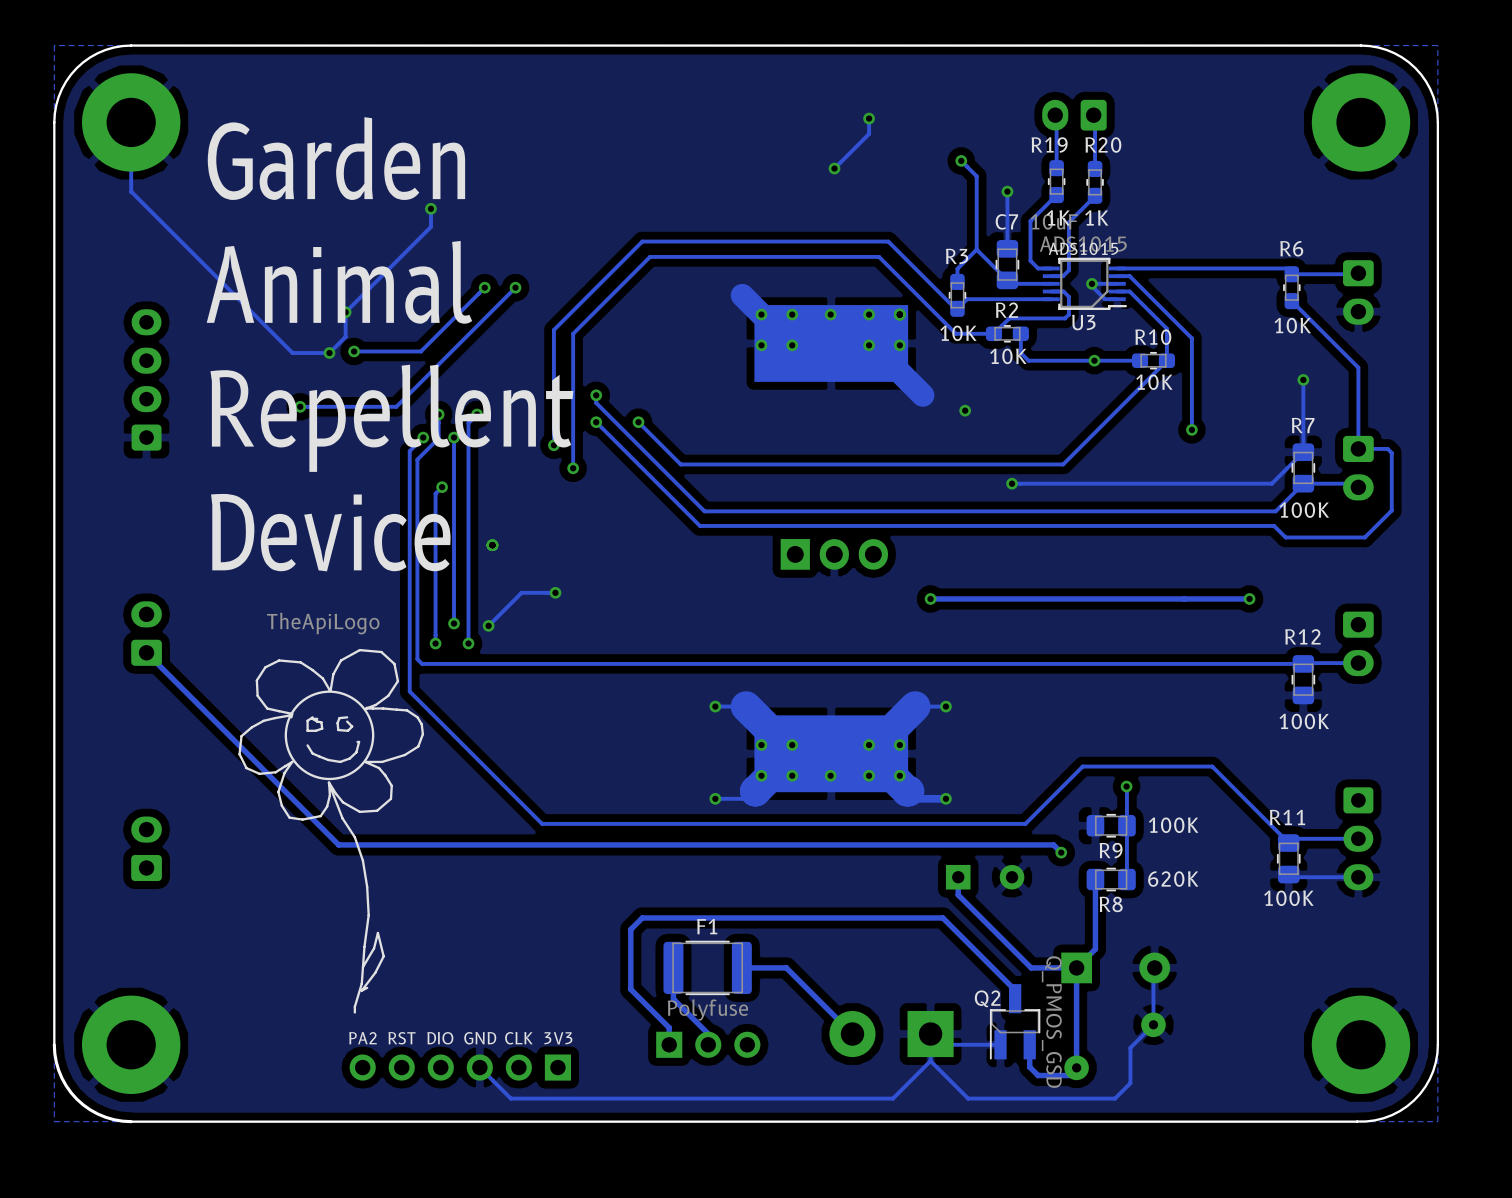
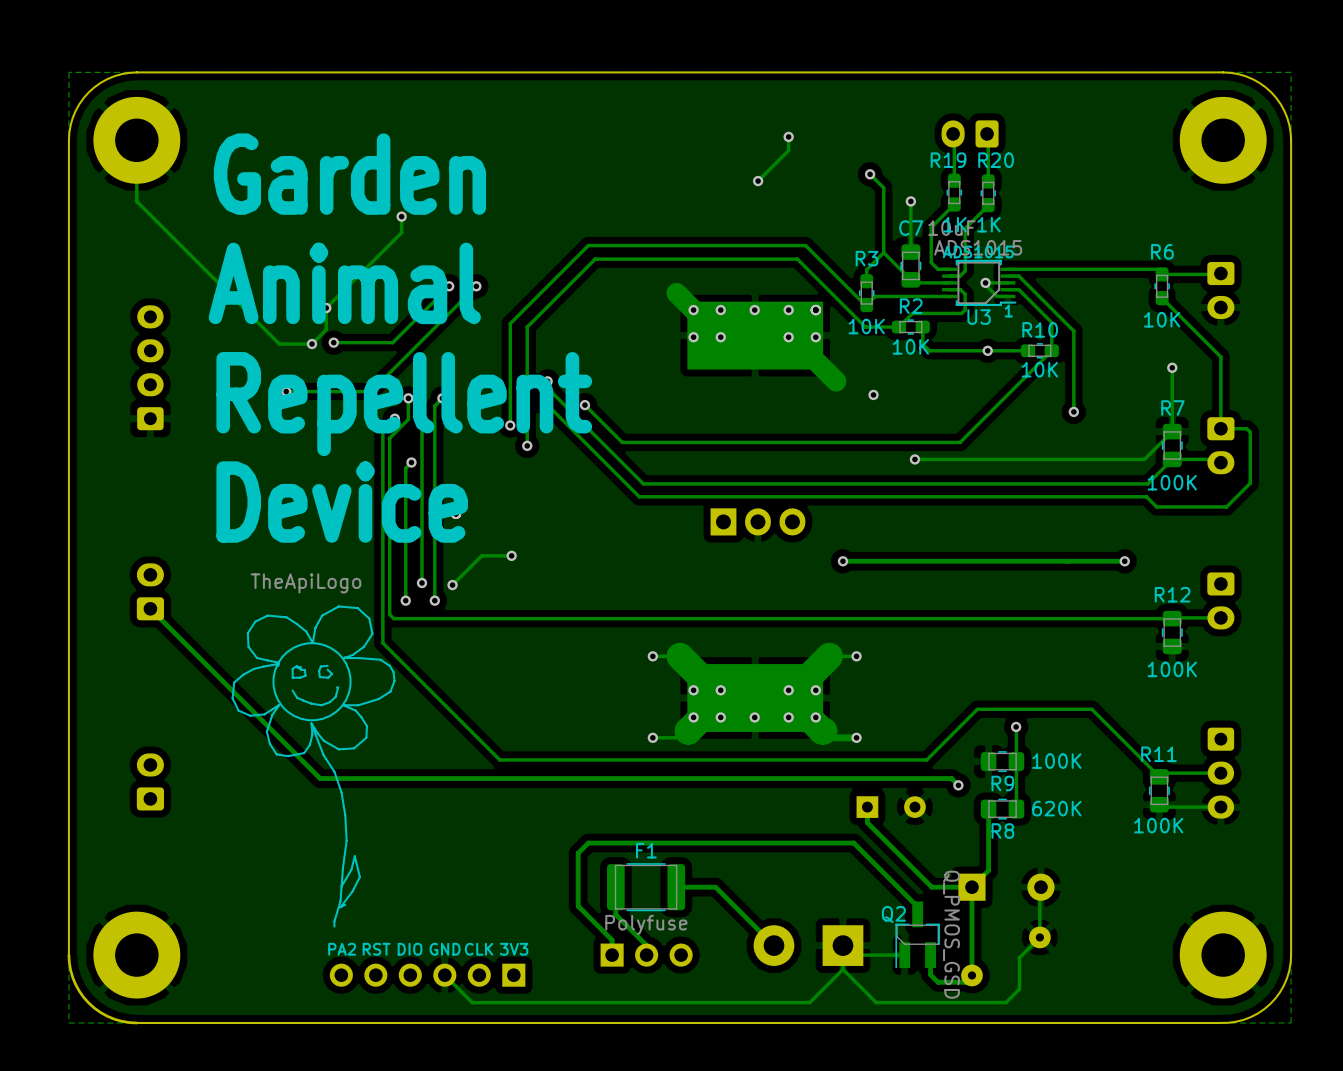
text: none -> 1 (1008, 311)

